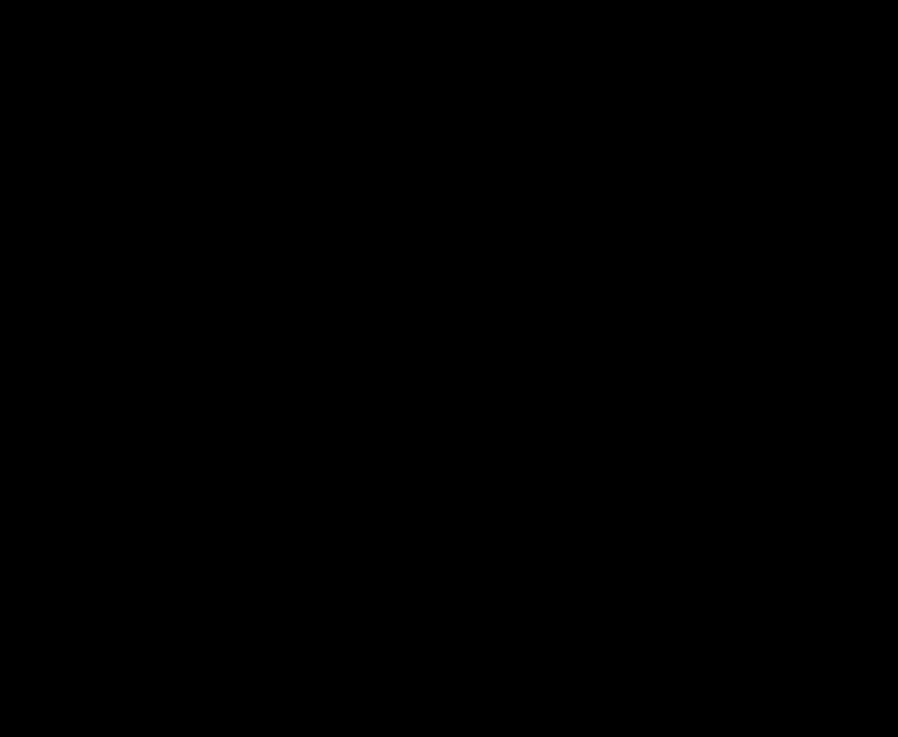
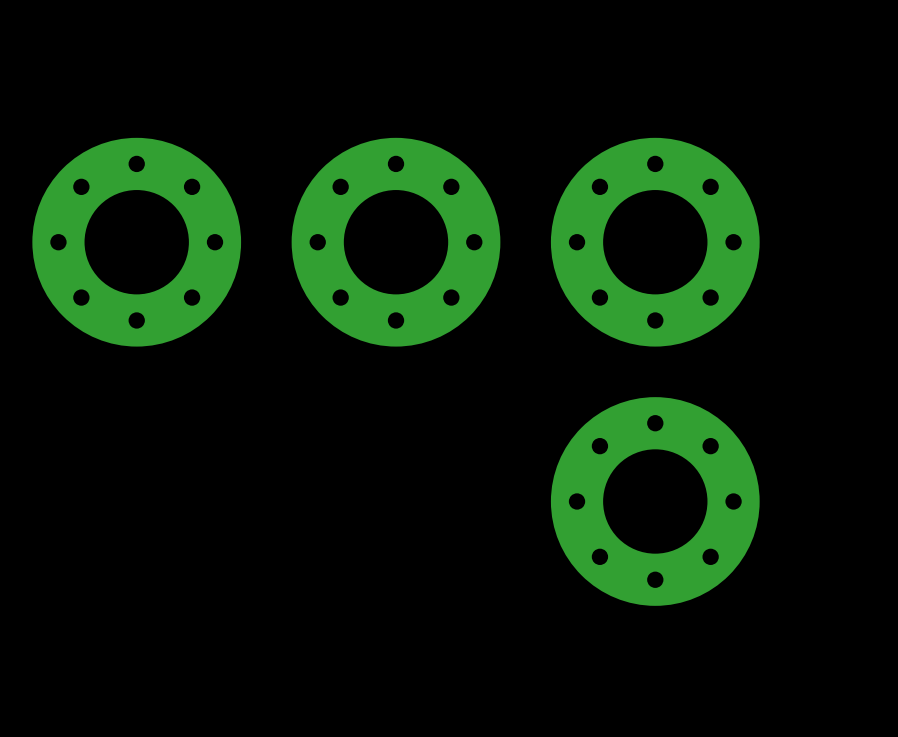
part: none -> (136, 242)
part: none -> (396, 242)
part: none -> (655, 242)
part: none -> (655, 501)

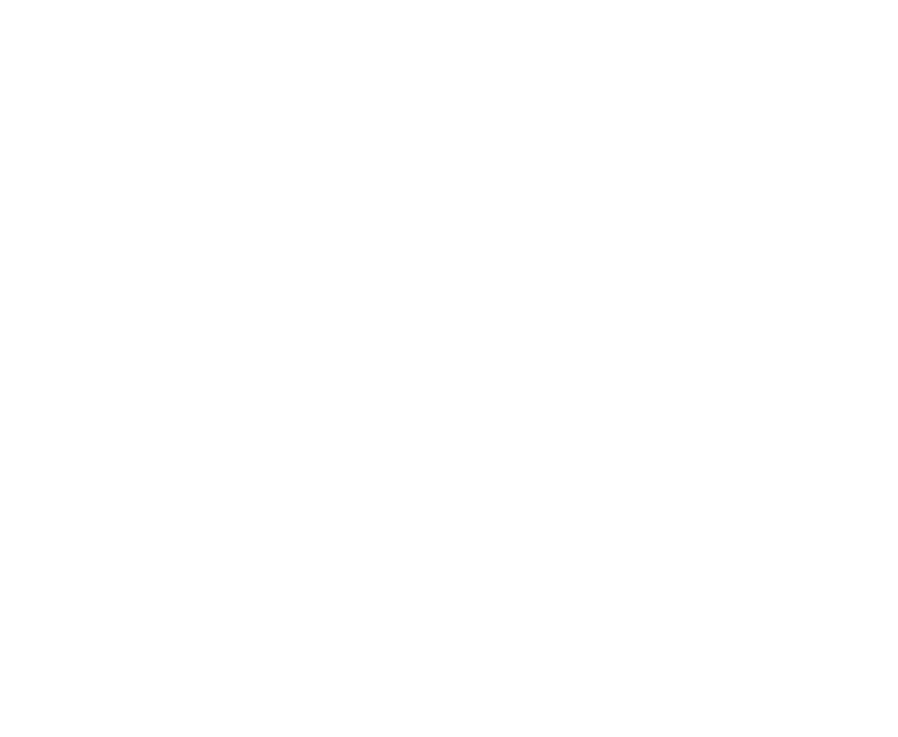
part: (136, 242) -> none
part: (396, 242) -> none
part: (655, 242) -> none
part: (655, 501) -> none

